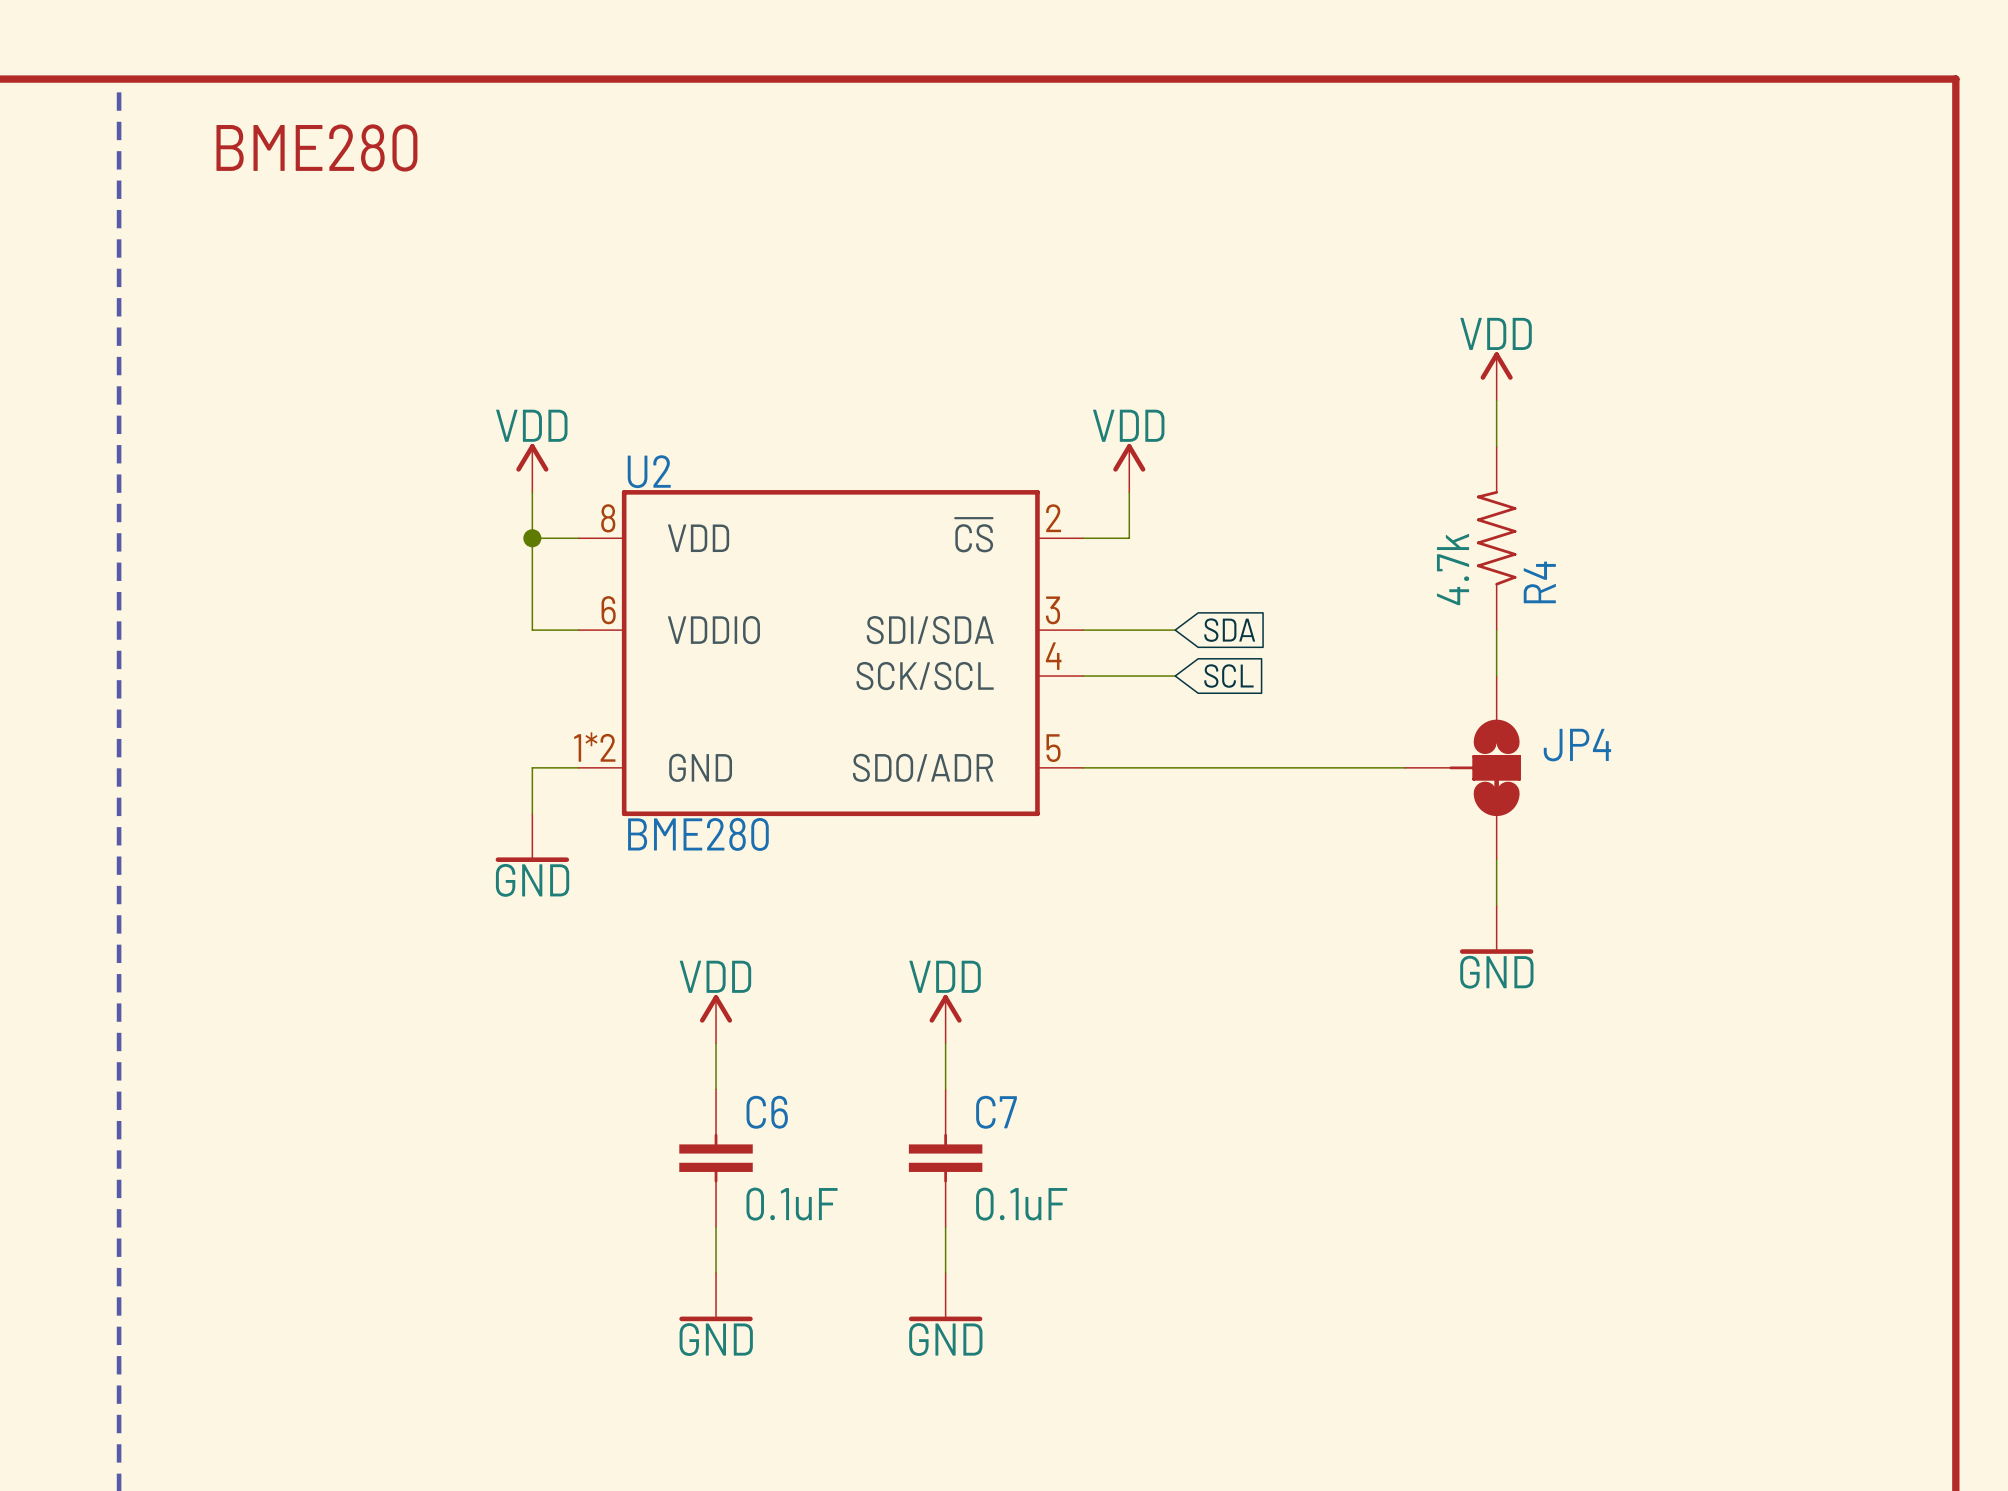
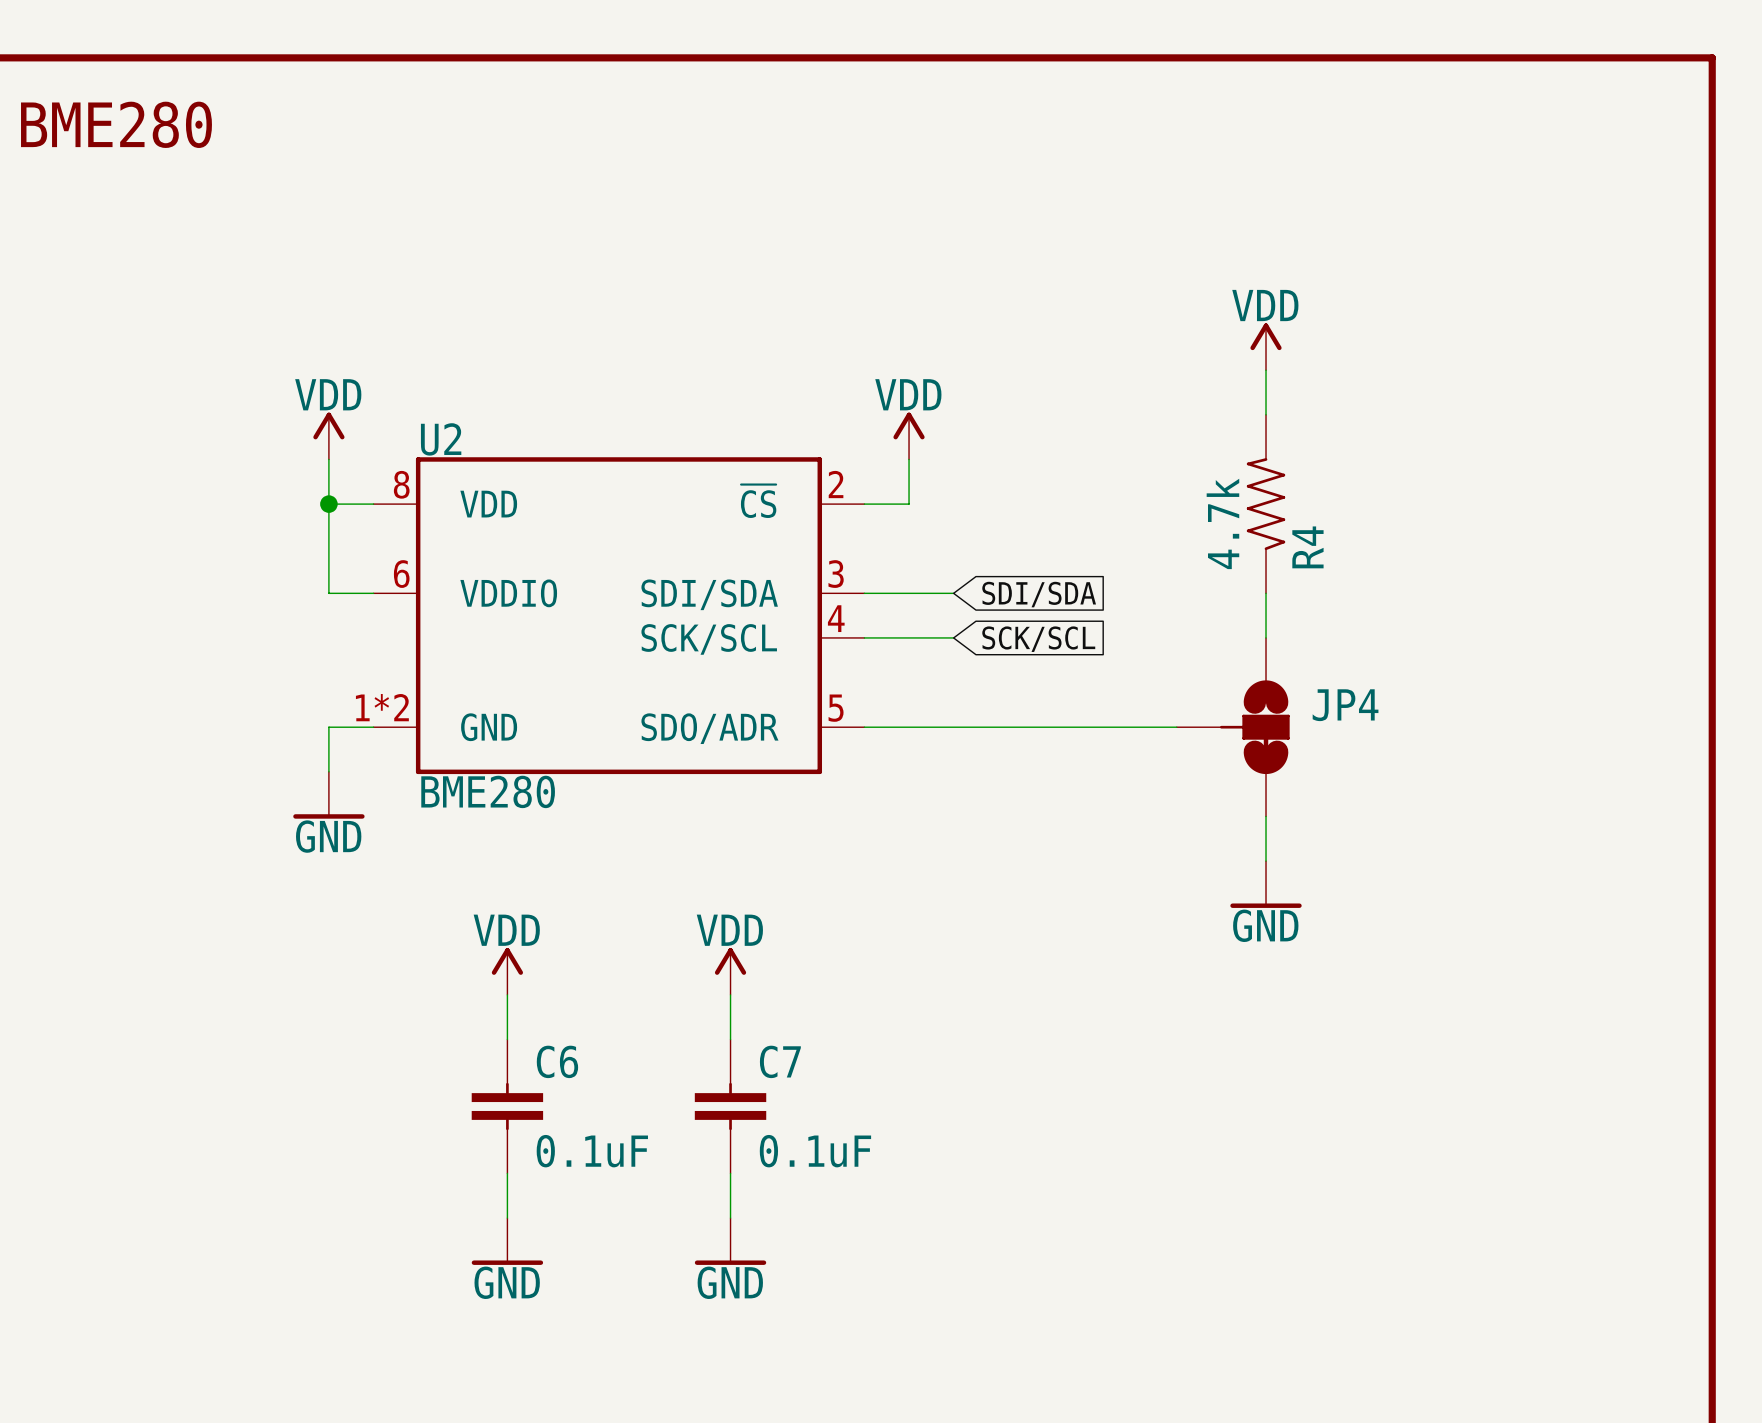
global label: SDA (1229, 630) -> SDI/SDA (1039, 594)
global label: SCL (1228, 676) -> SCK/SCL (1038, 639)

